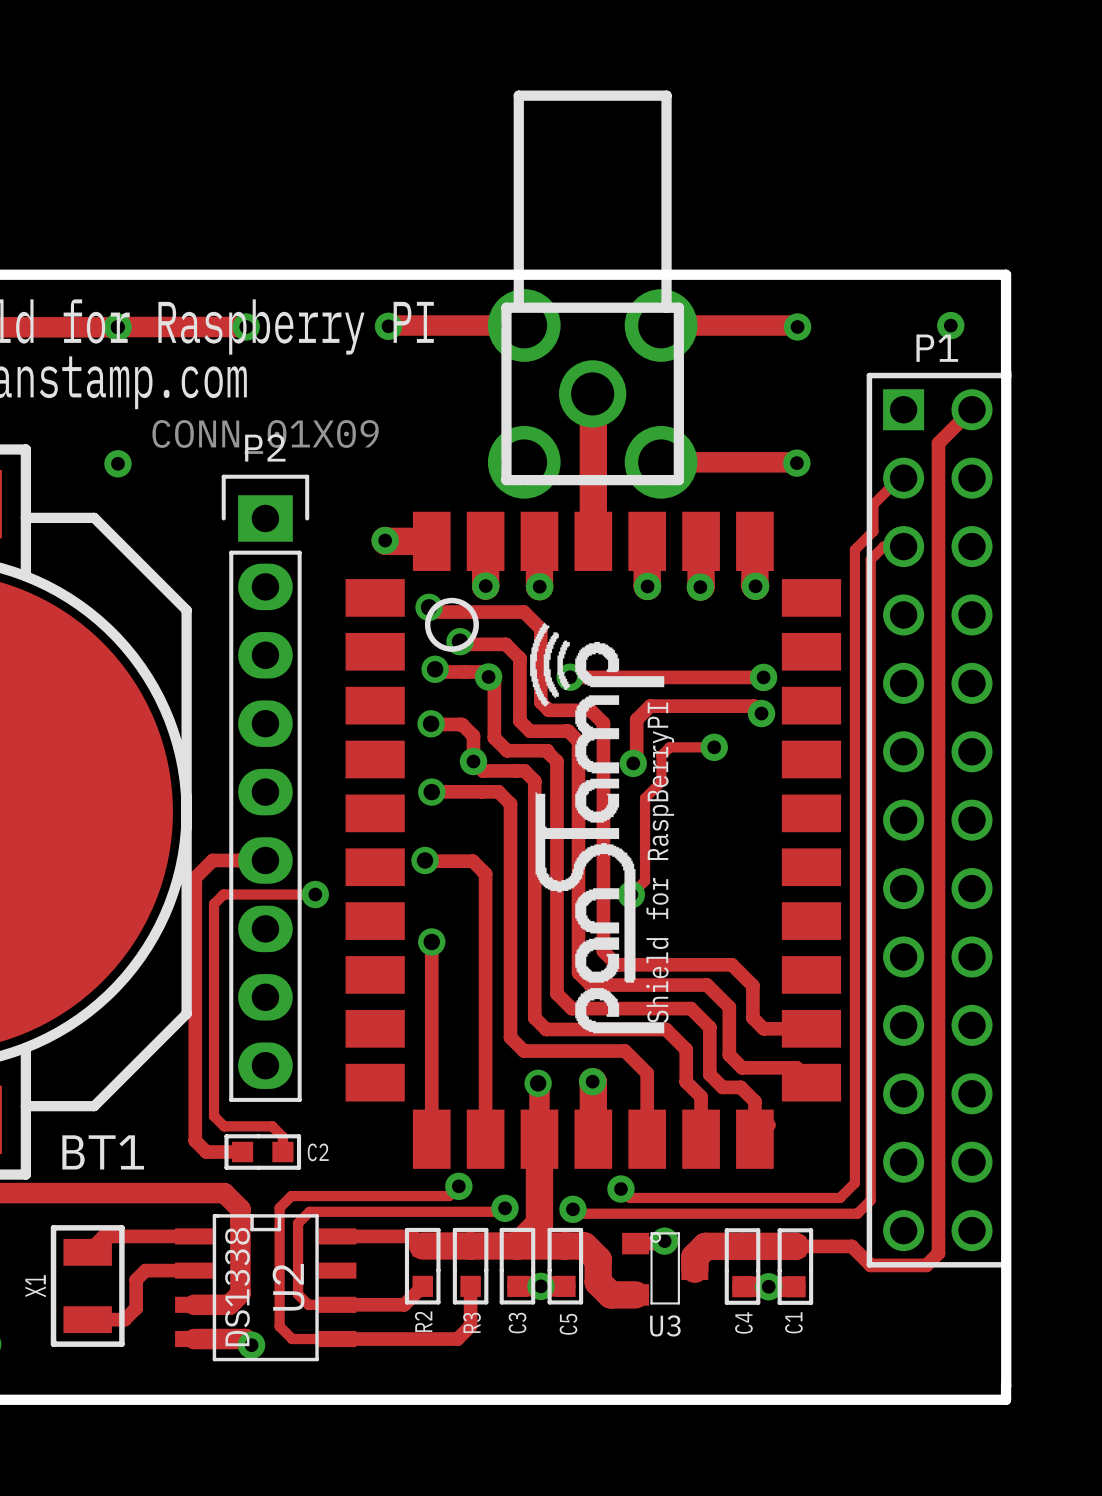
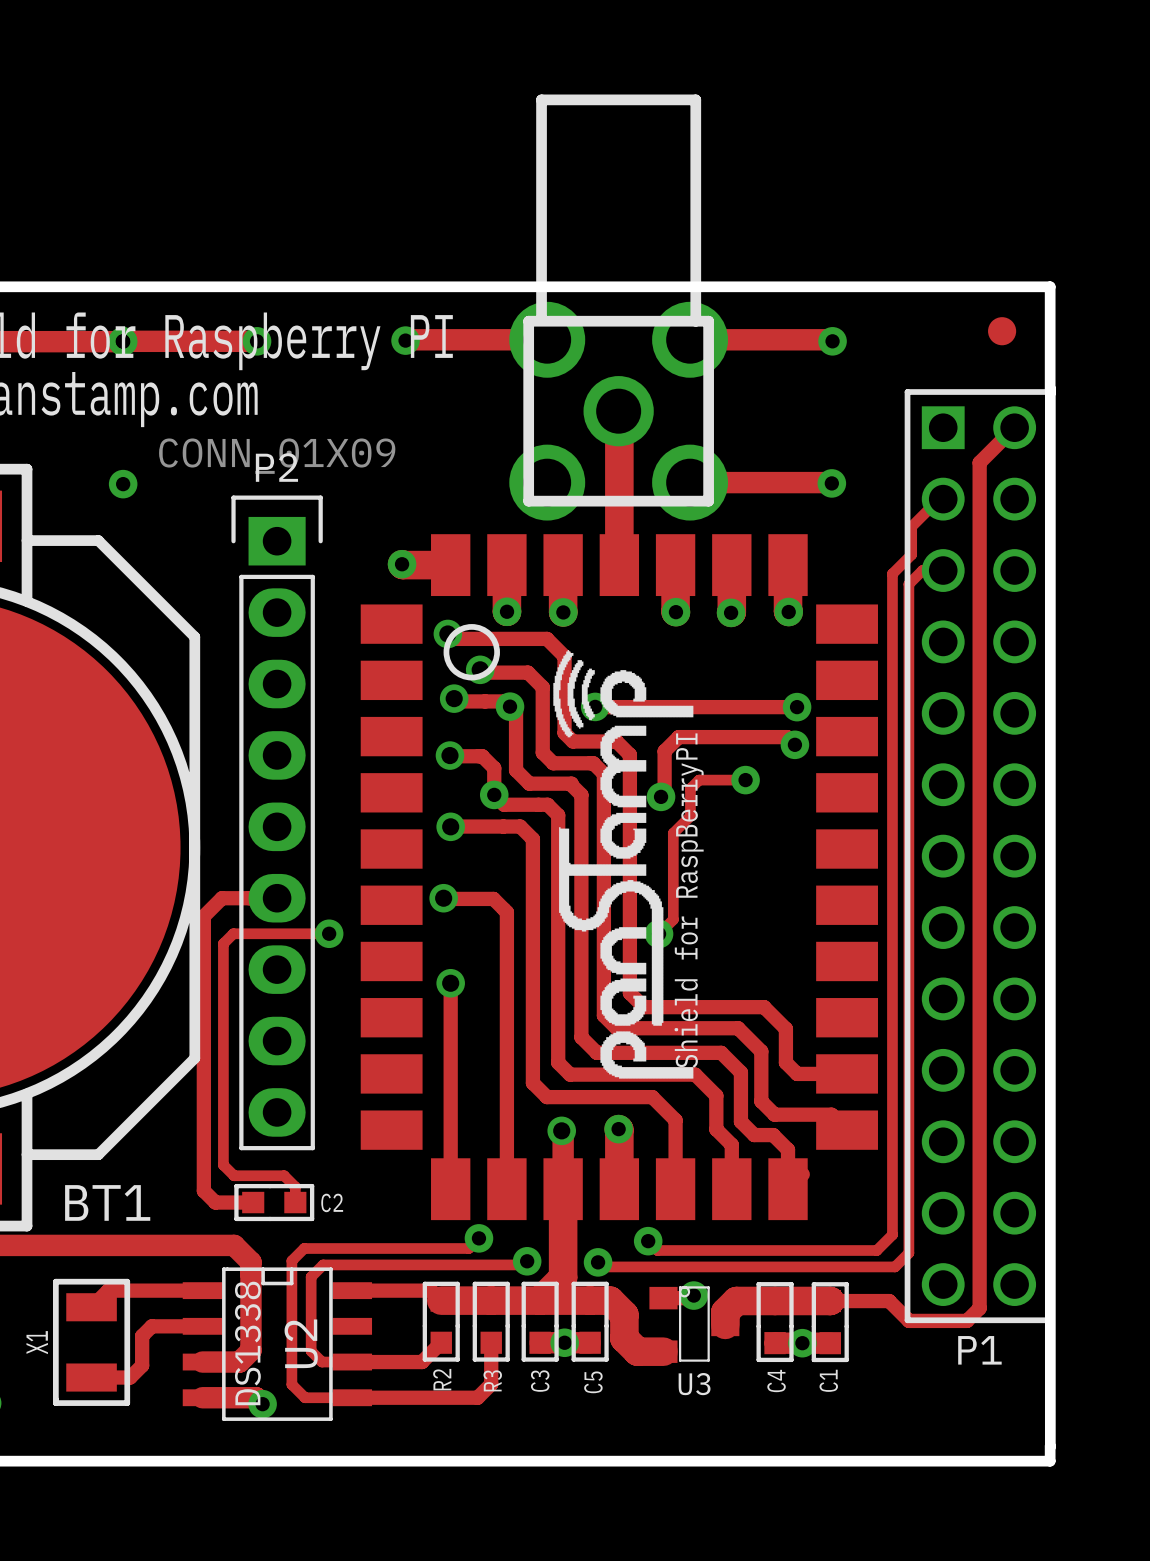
part: none -> (1002, 331)
via: (950, 325) -> none
P1 name position: P1 (937, 348) -> P1 (979, 1350)

